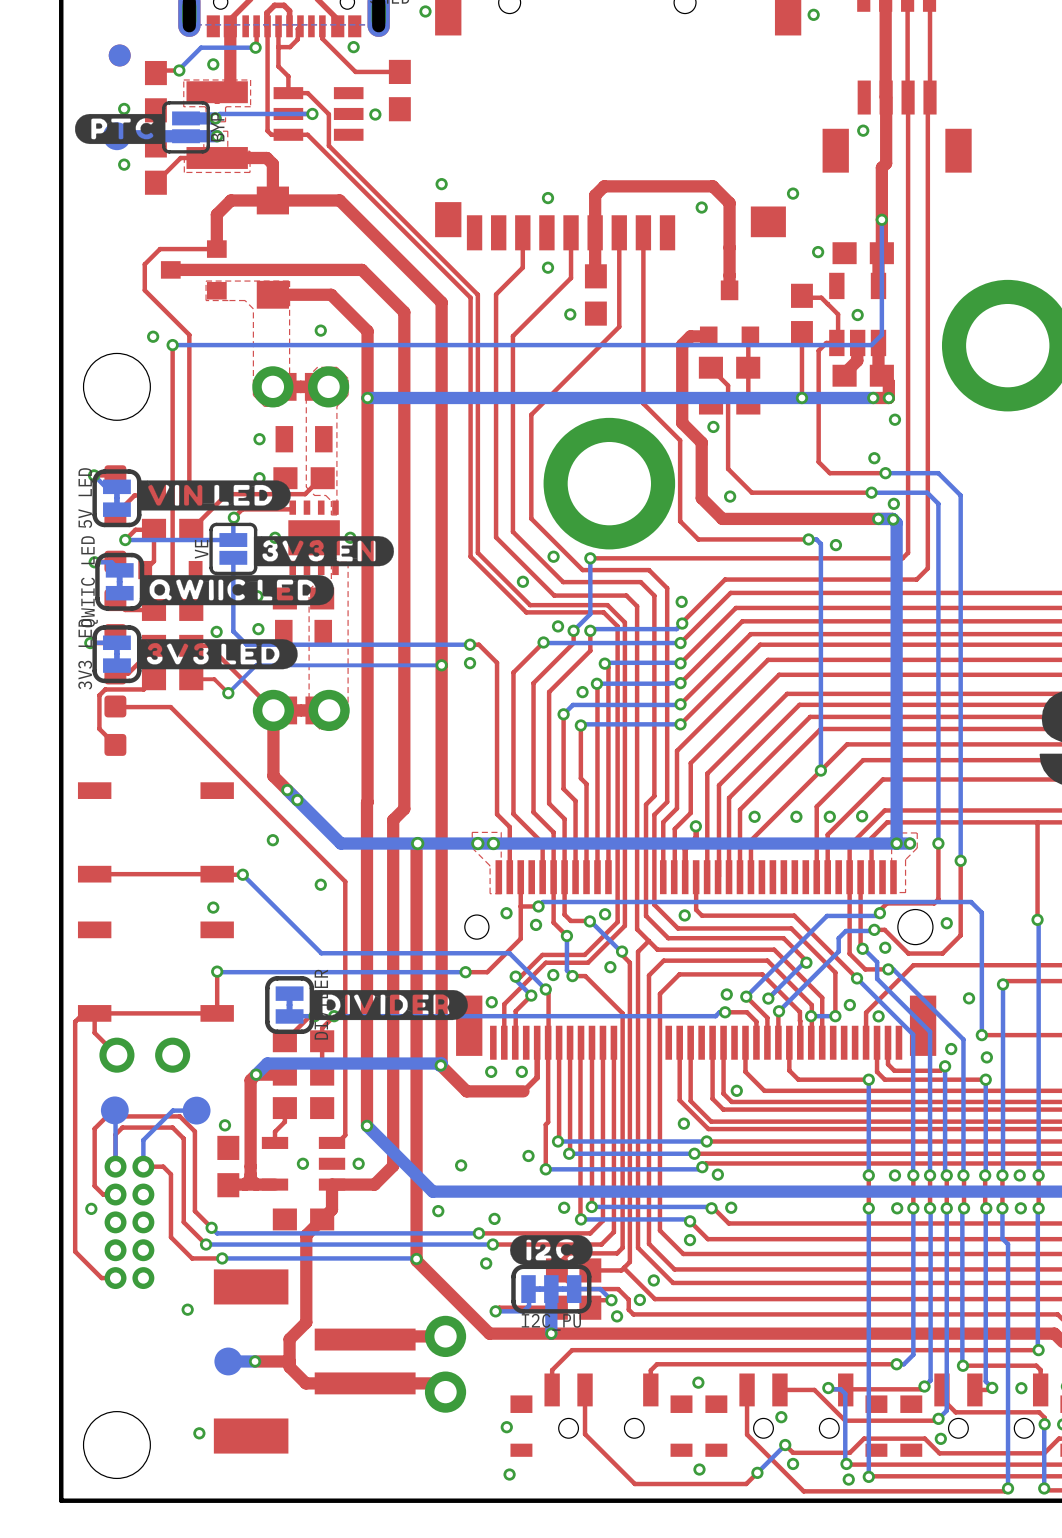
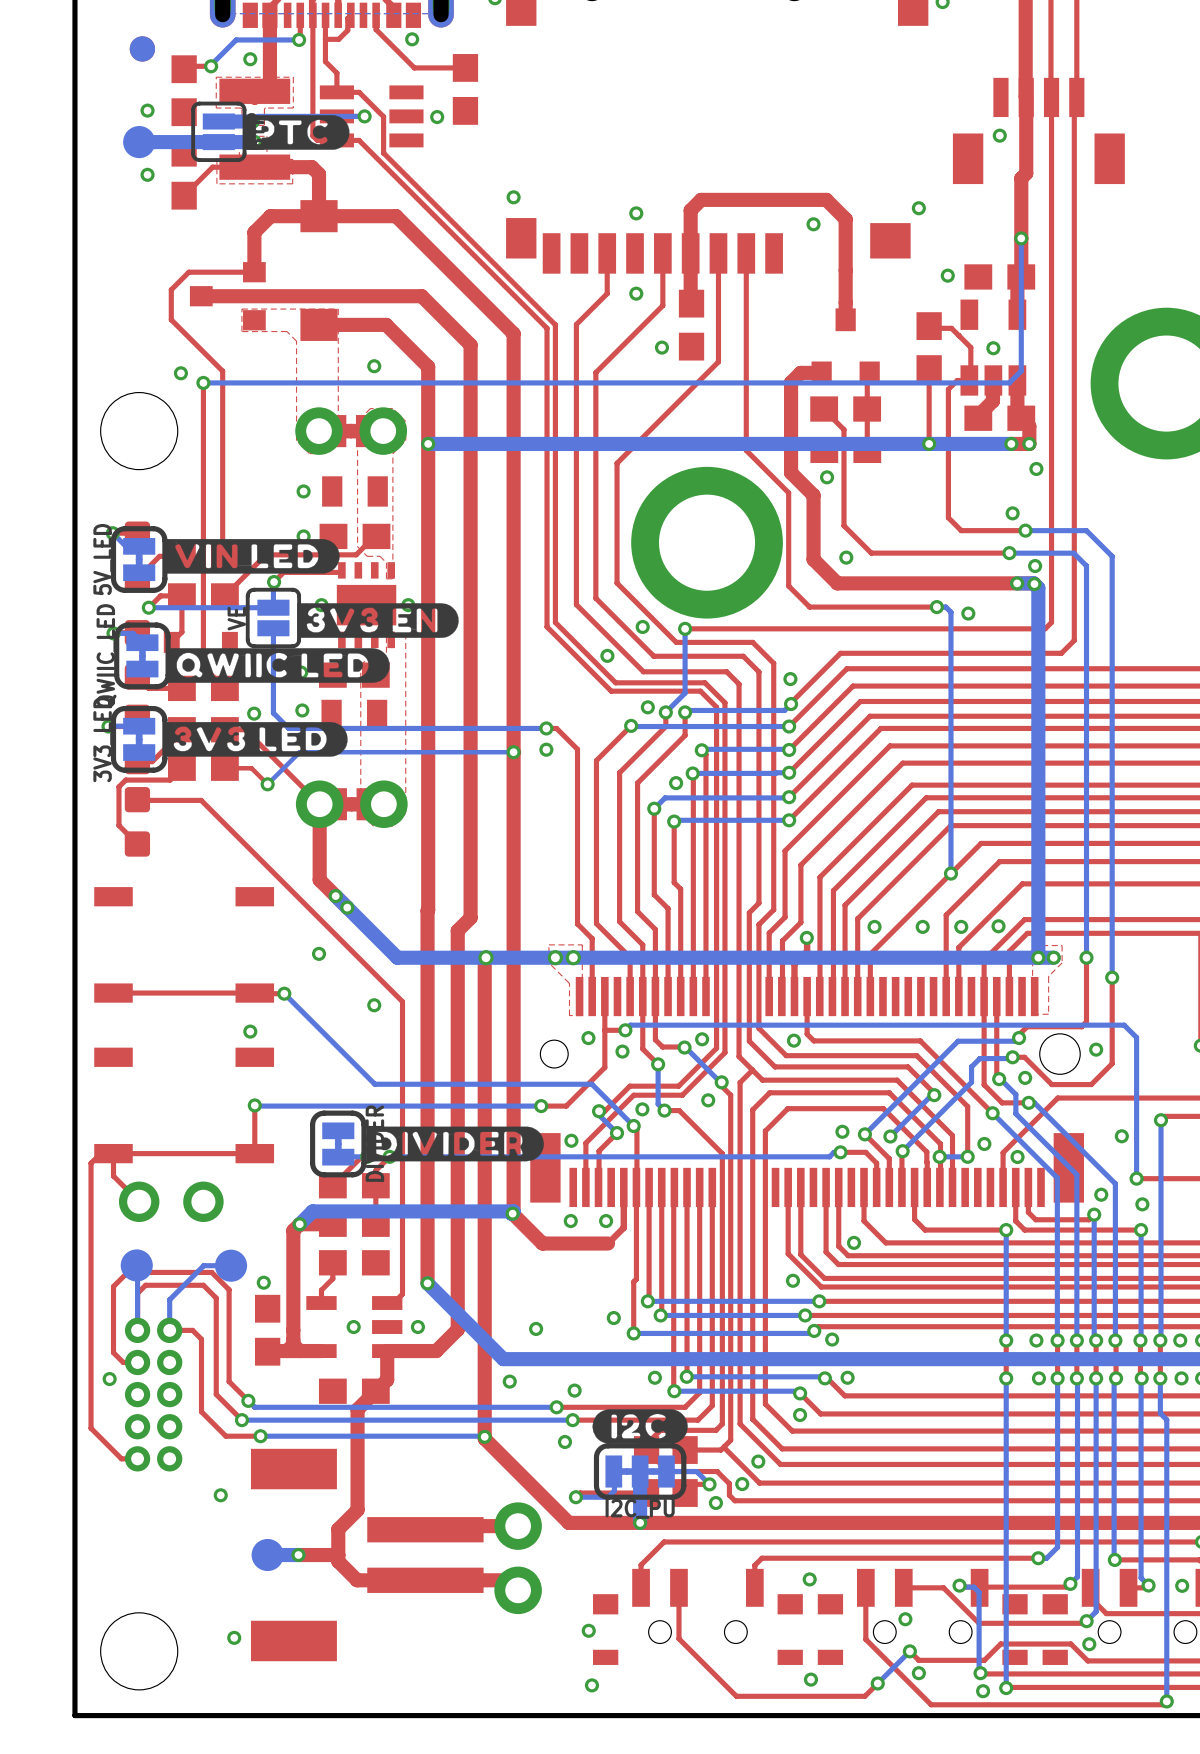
drawing: none -> [245, 115, 350, 150]
drawing: [75, 113, 165, 145] -> none

